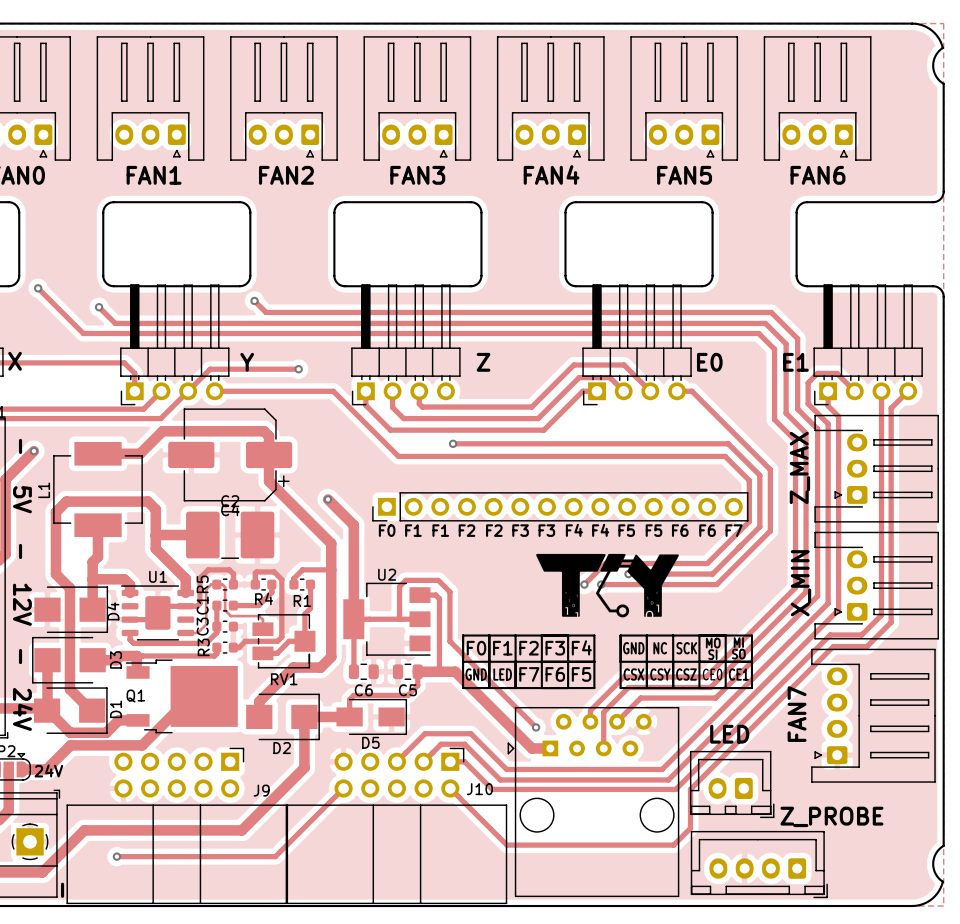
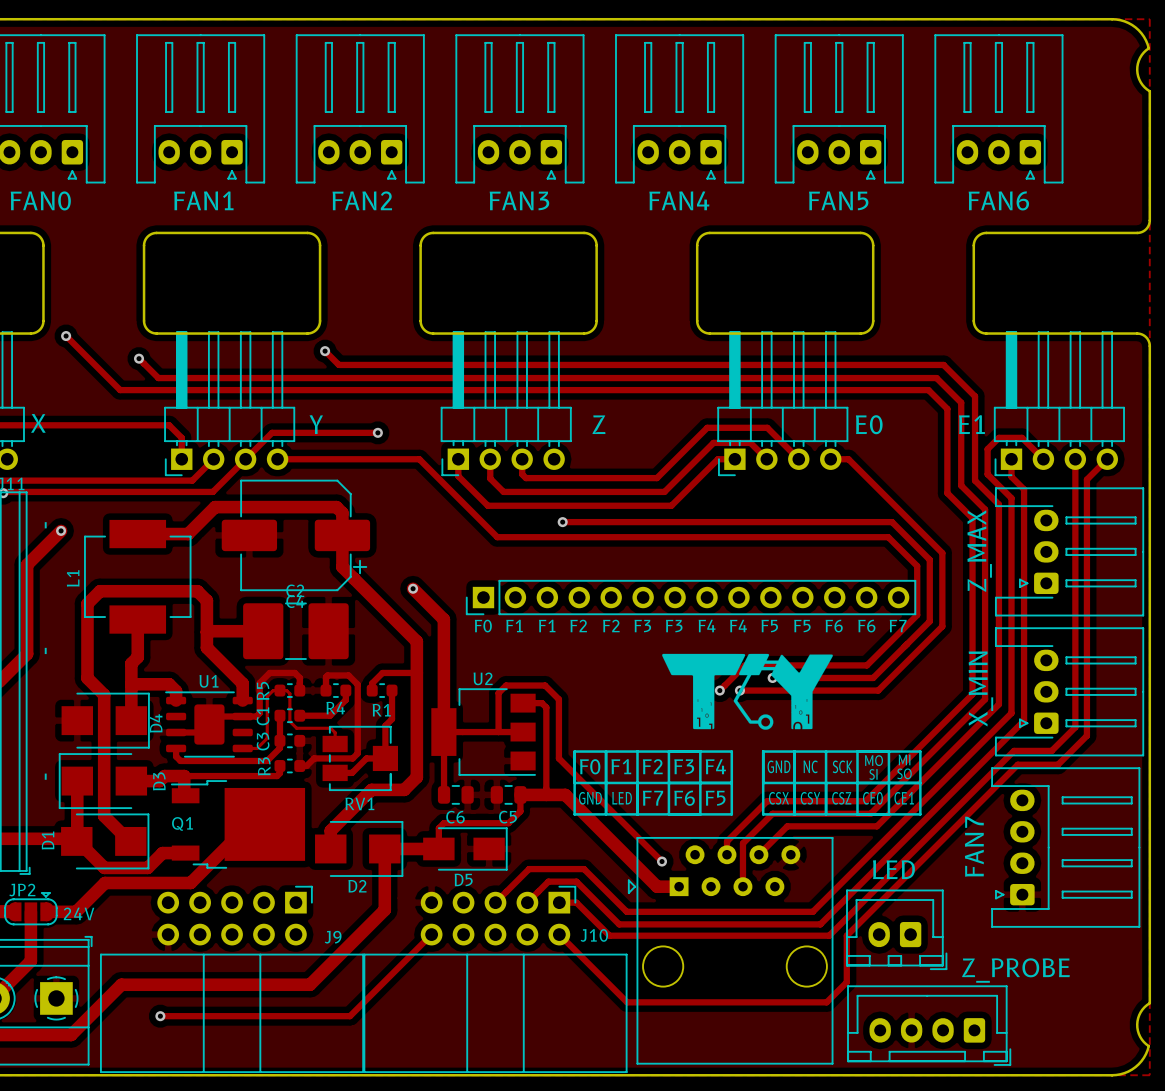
text: 5V (22, 499) -> none
text: 12V (22, 604) -> none
text: 24V (22, 709) -> none
D1 name position: D1 (116, 709) -> D1 (48, 840)
text: - (62, 890) -> none

